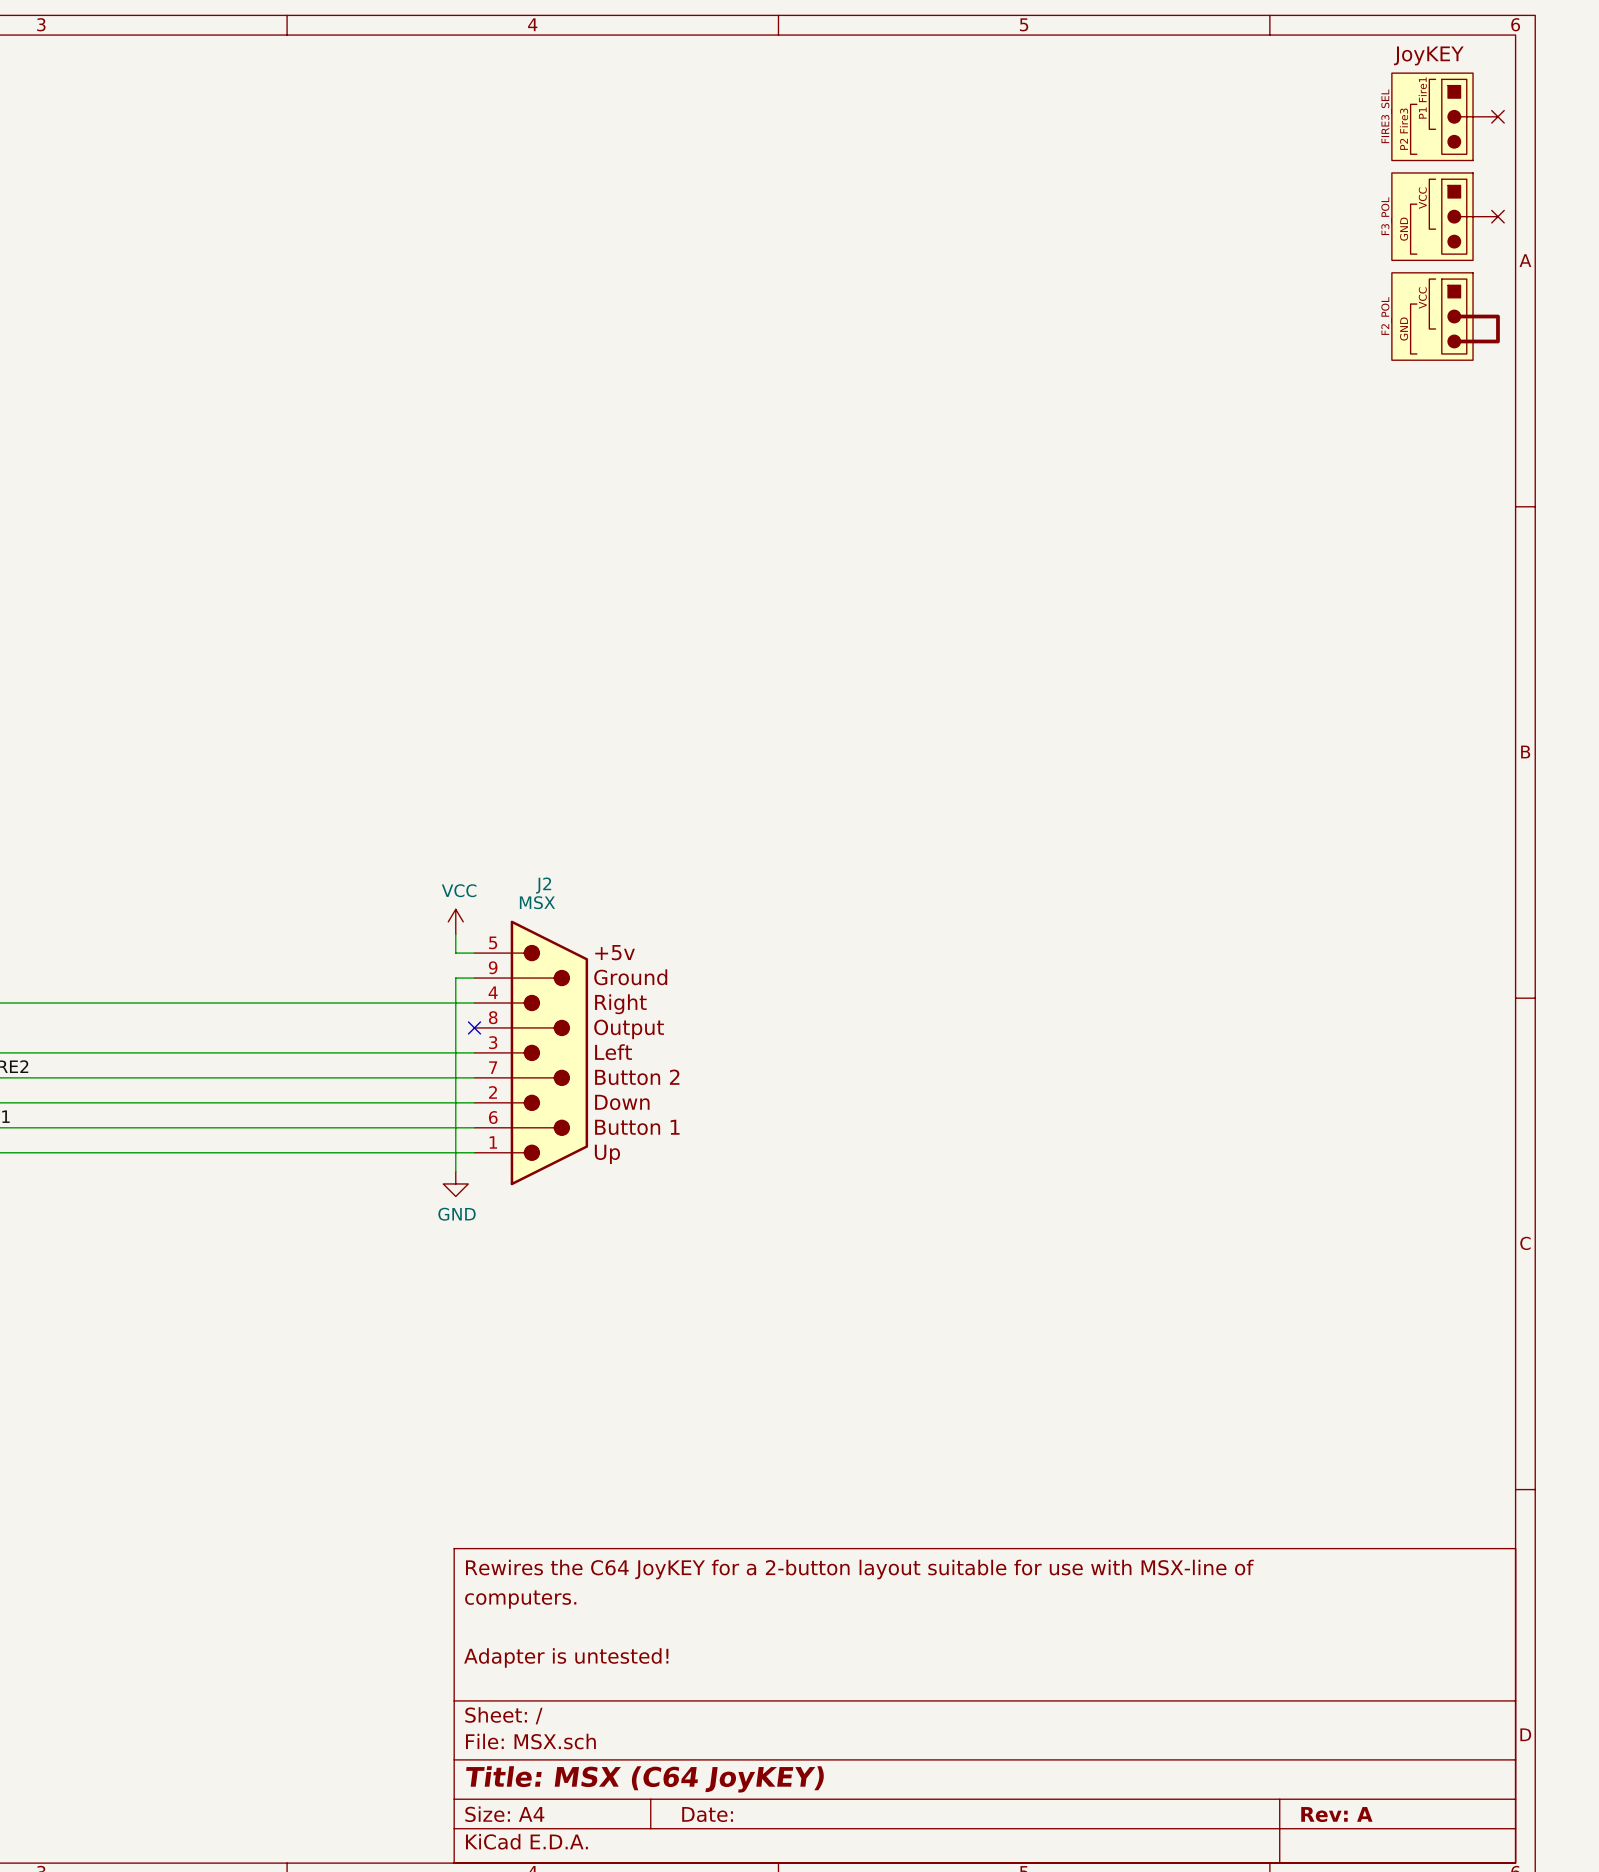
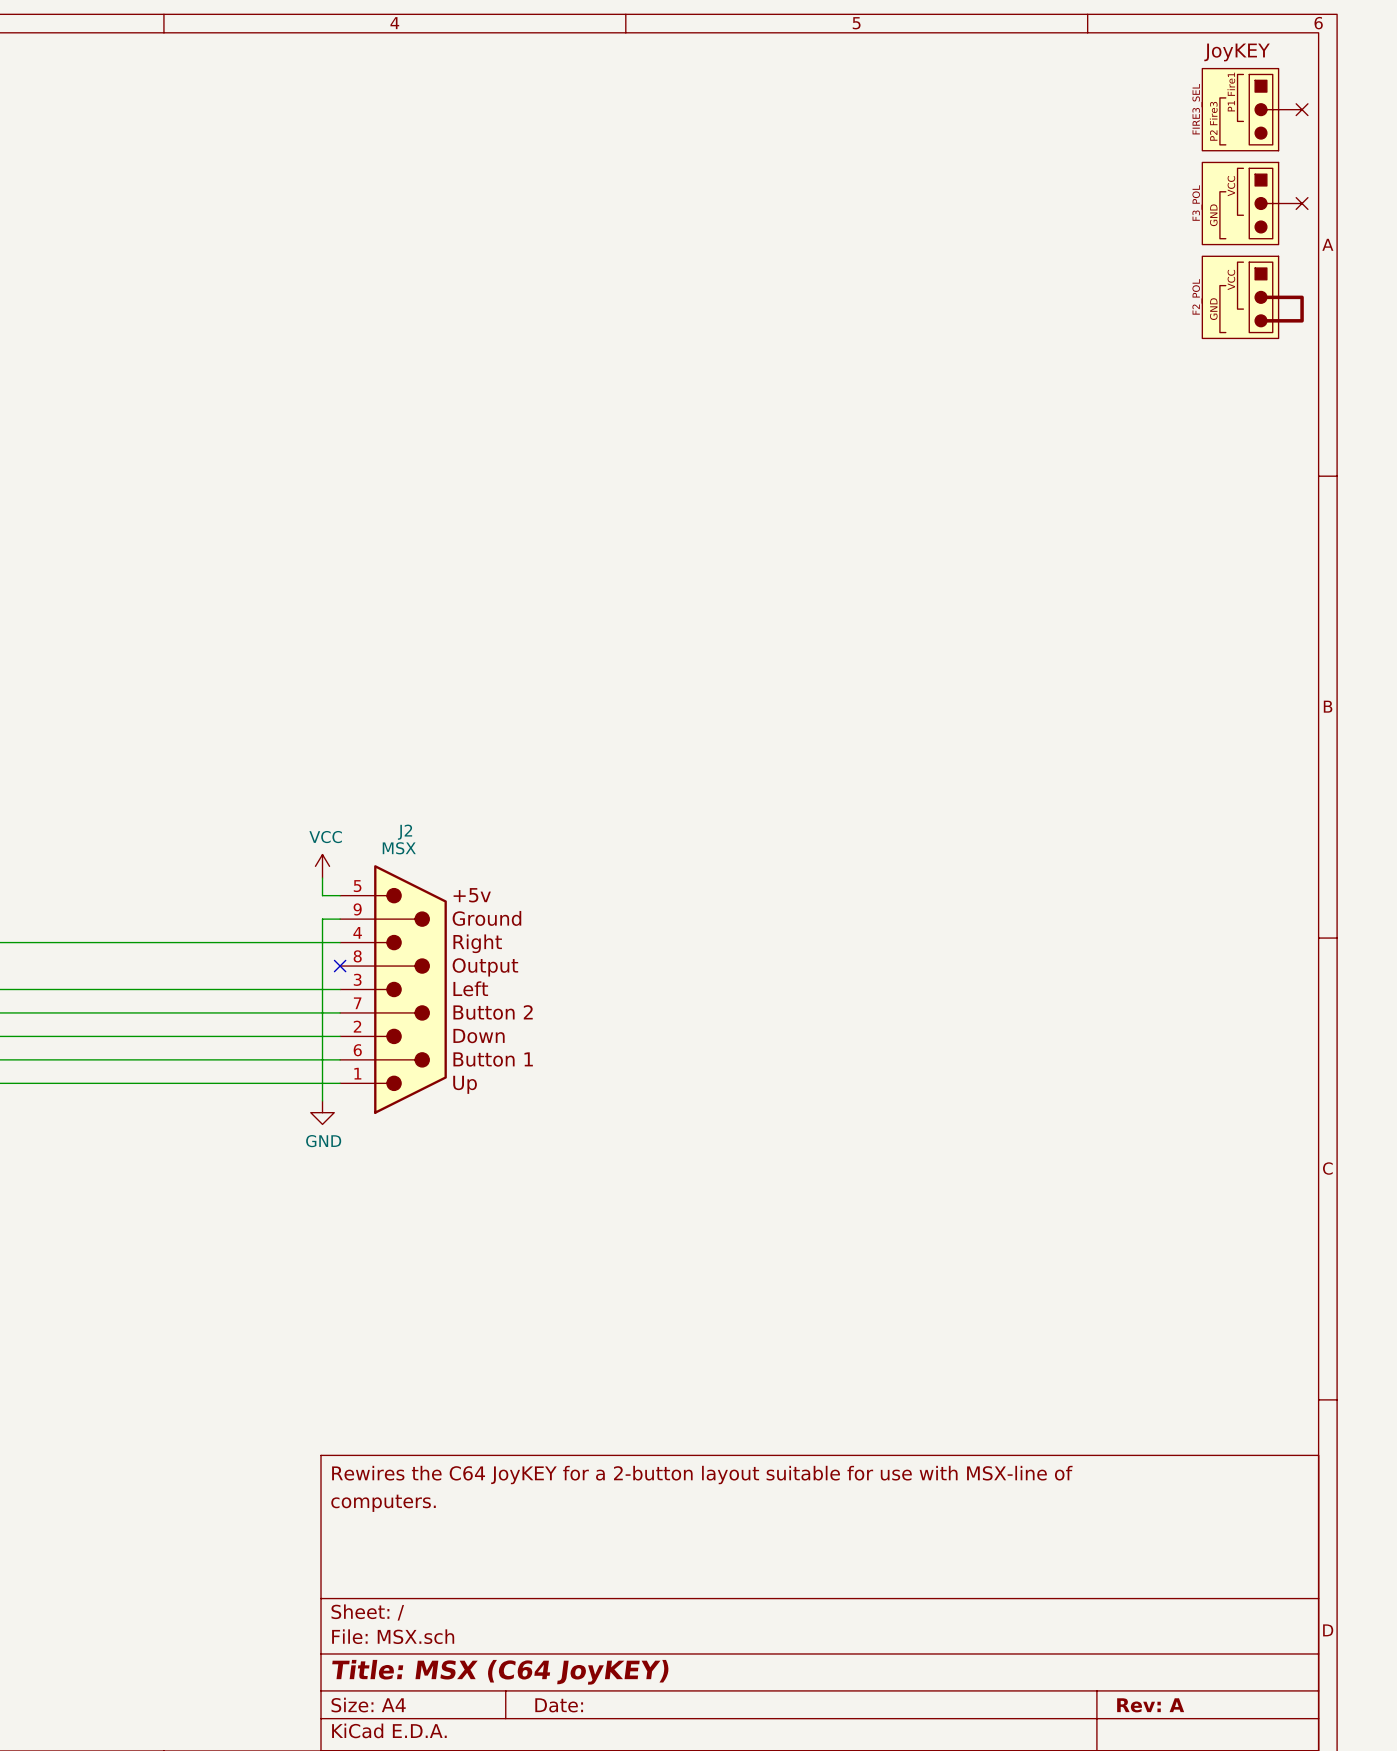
title block: Adapter is untested! (566, 1657) -> none

